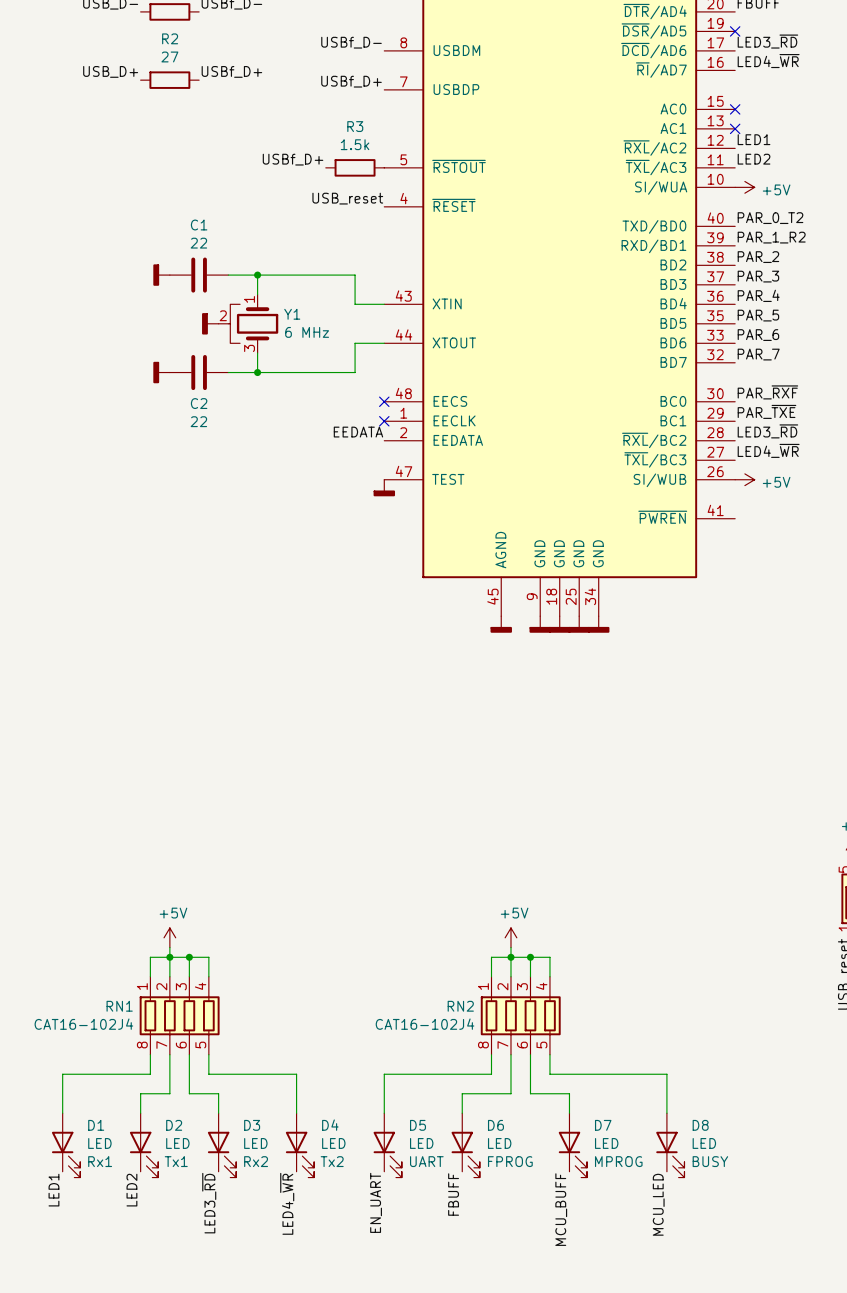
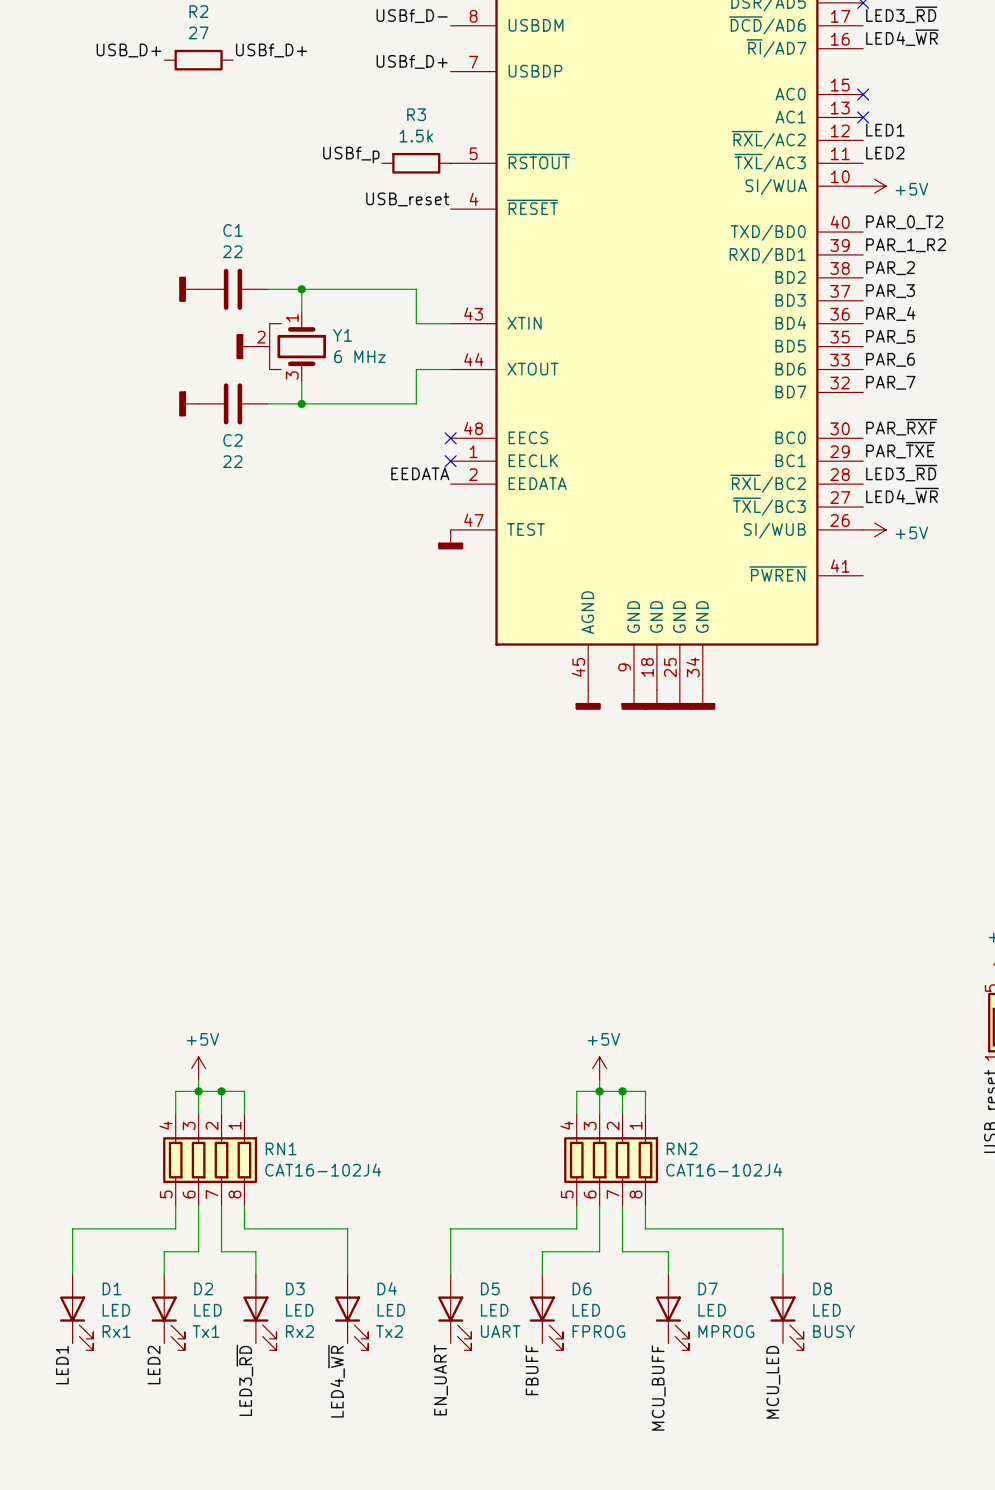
label: USBf_D+ (293, 159) -> USBf_p (351, 154)
RN1 flip: as is (179, 1015) -> left-right (210, 1160)
RN2 flip: as is (520, 1015) -> left-right (611, 1160)

